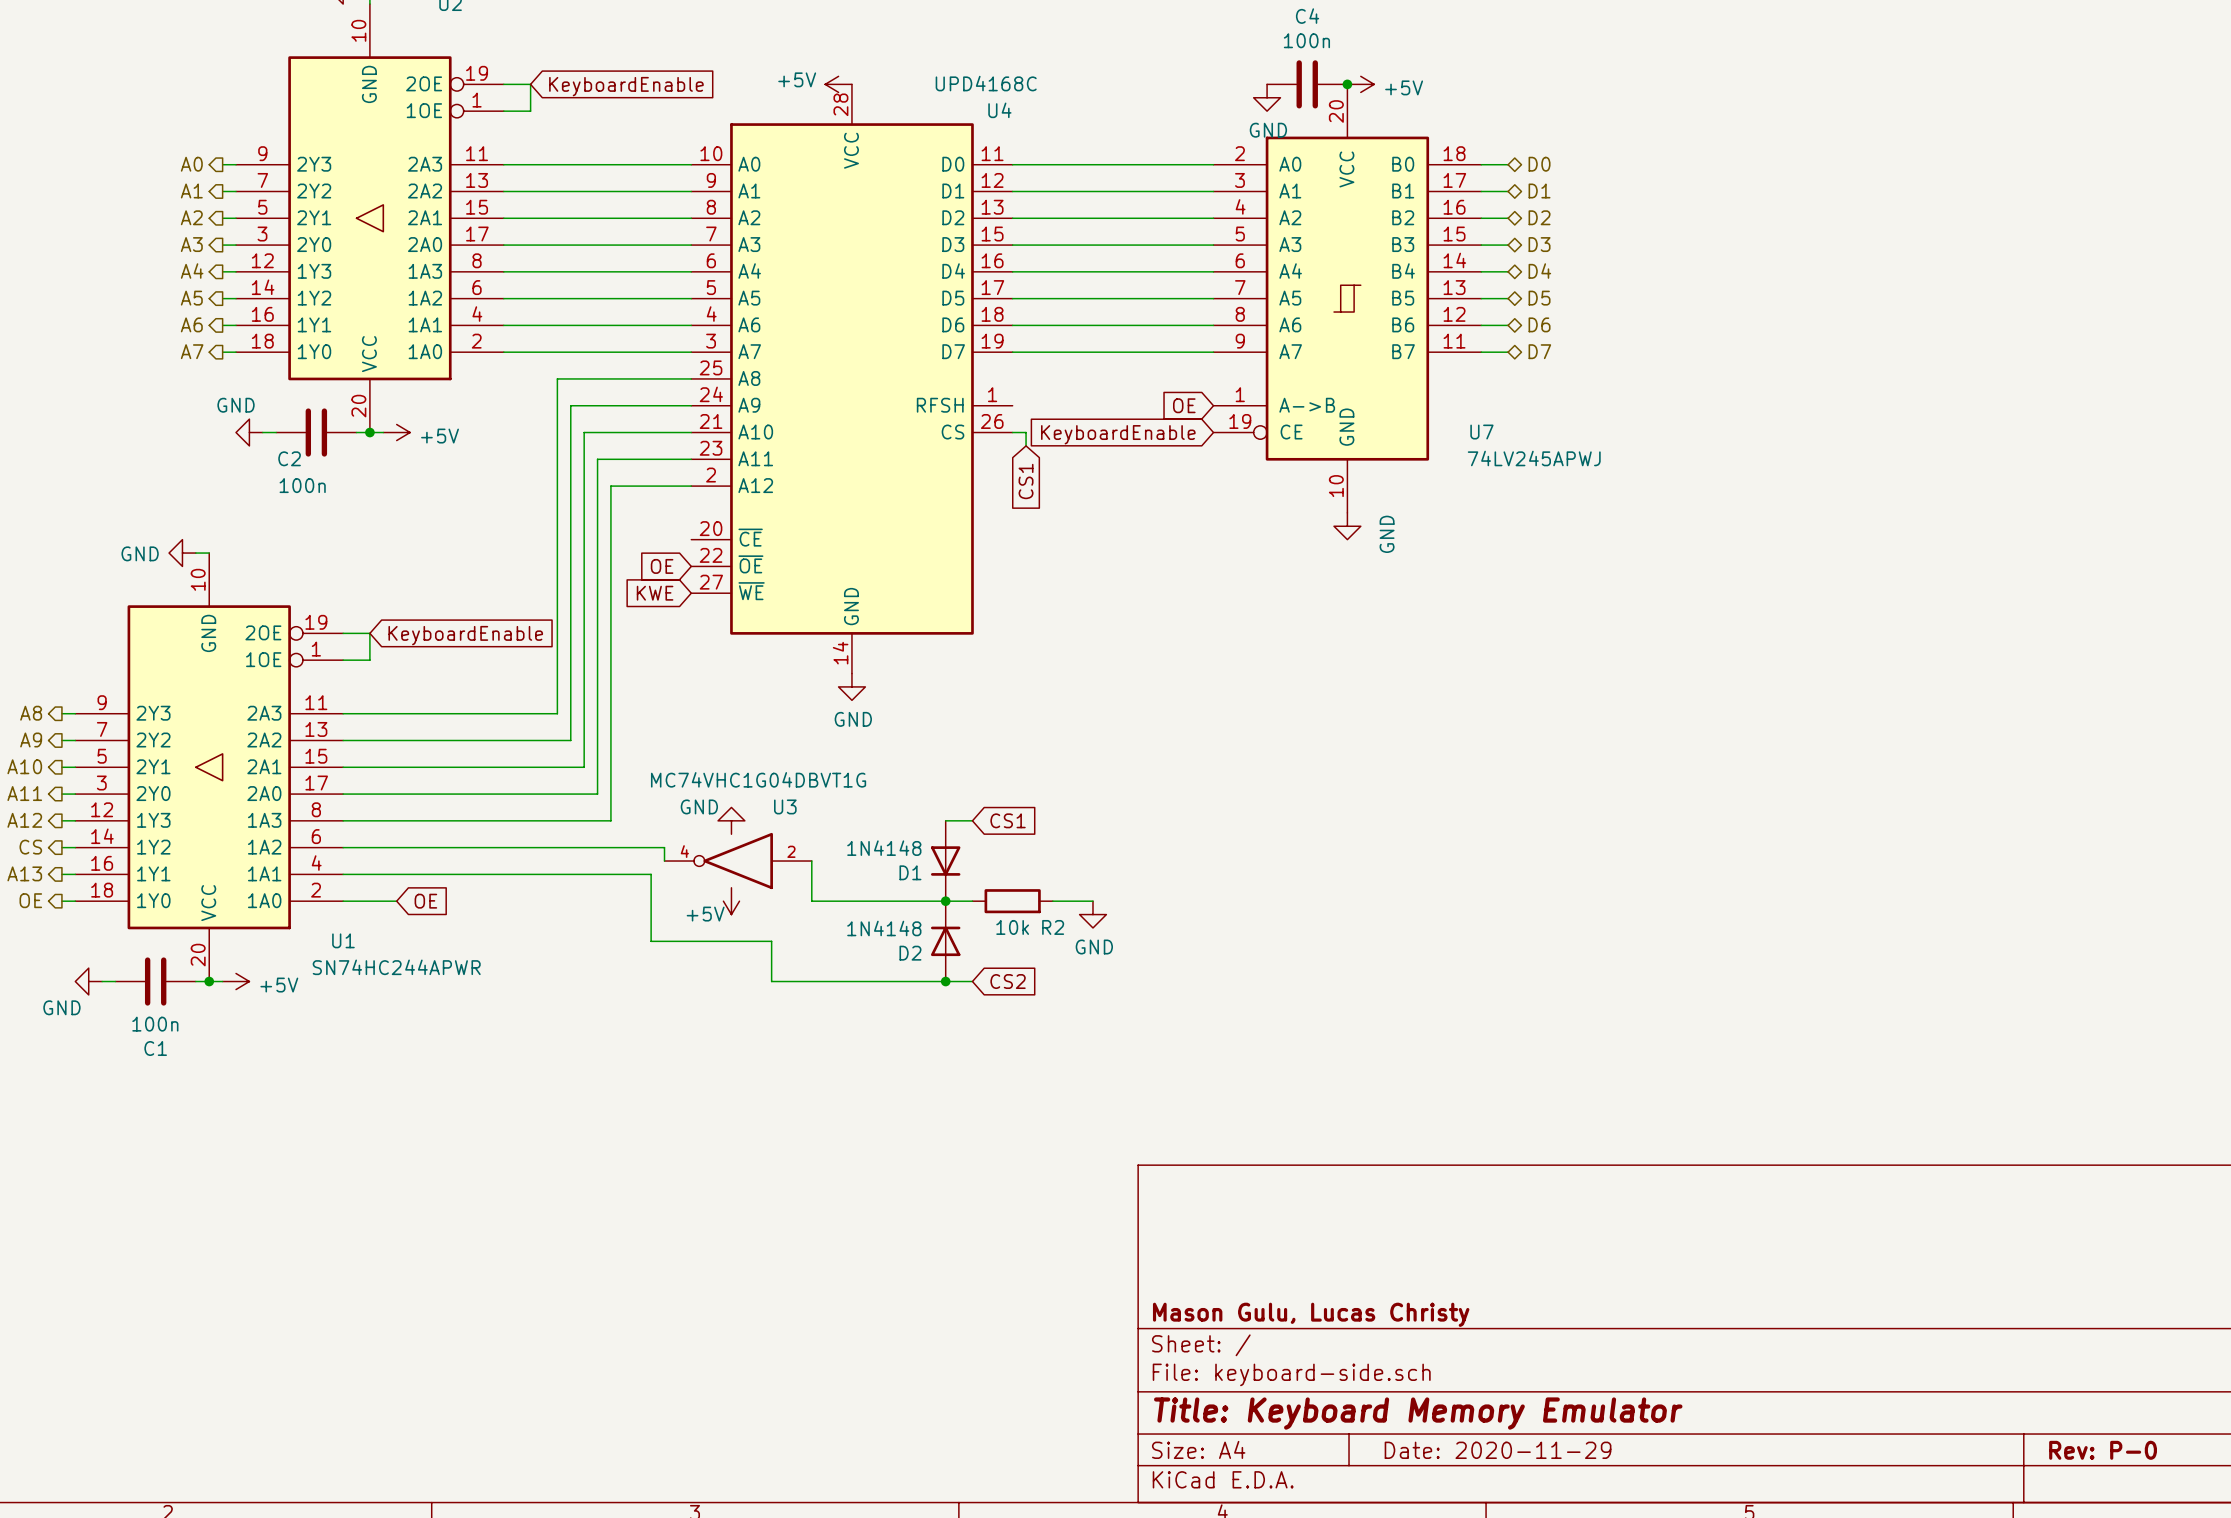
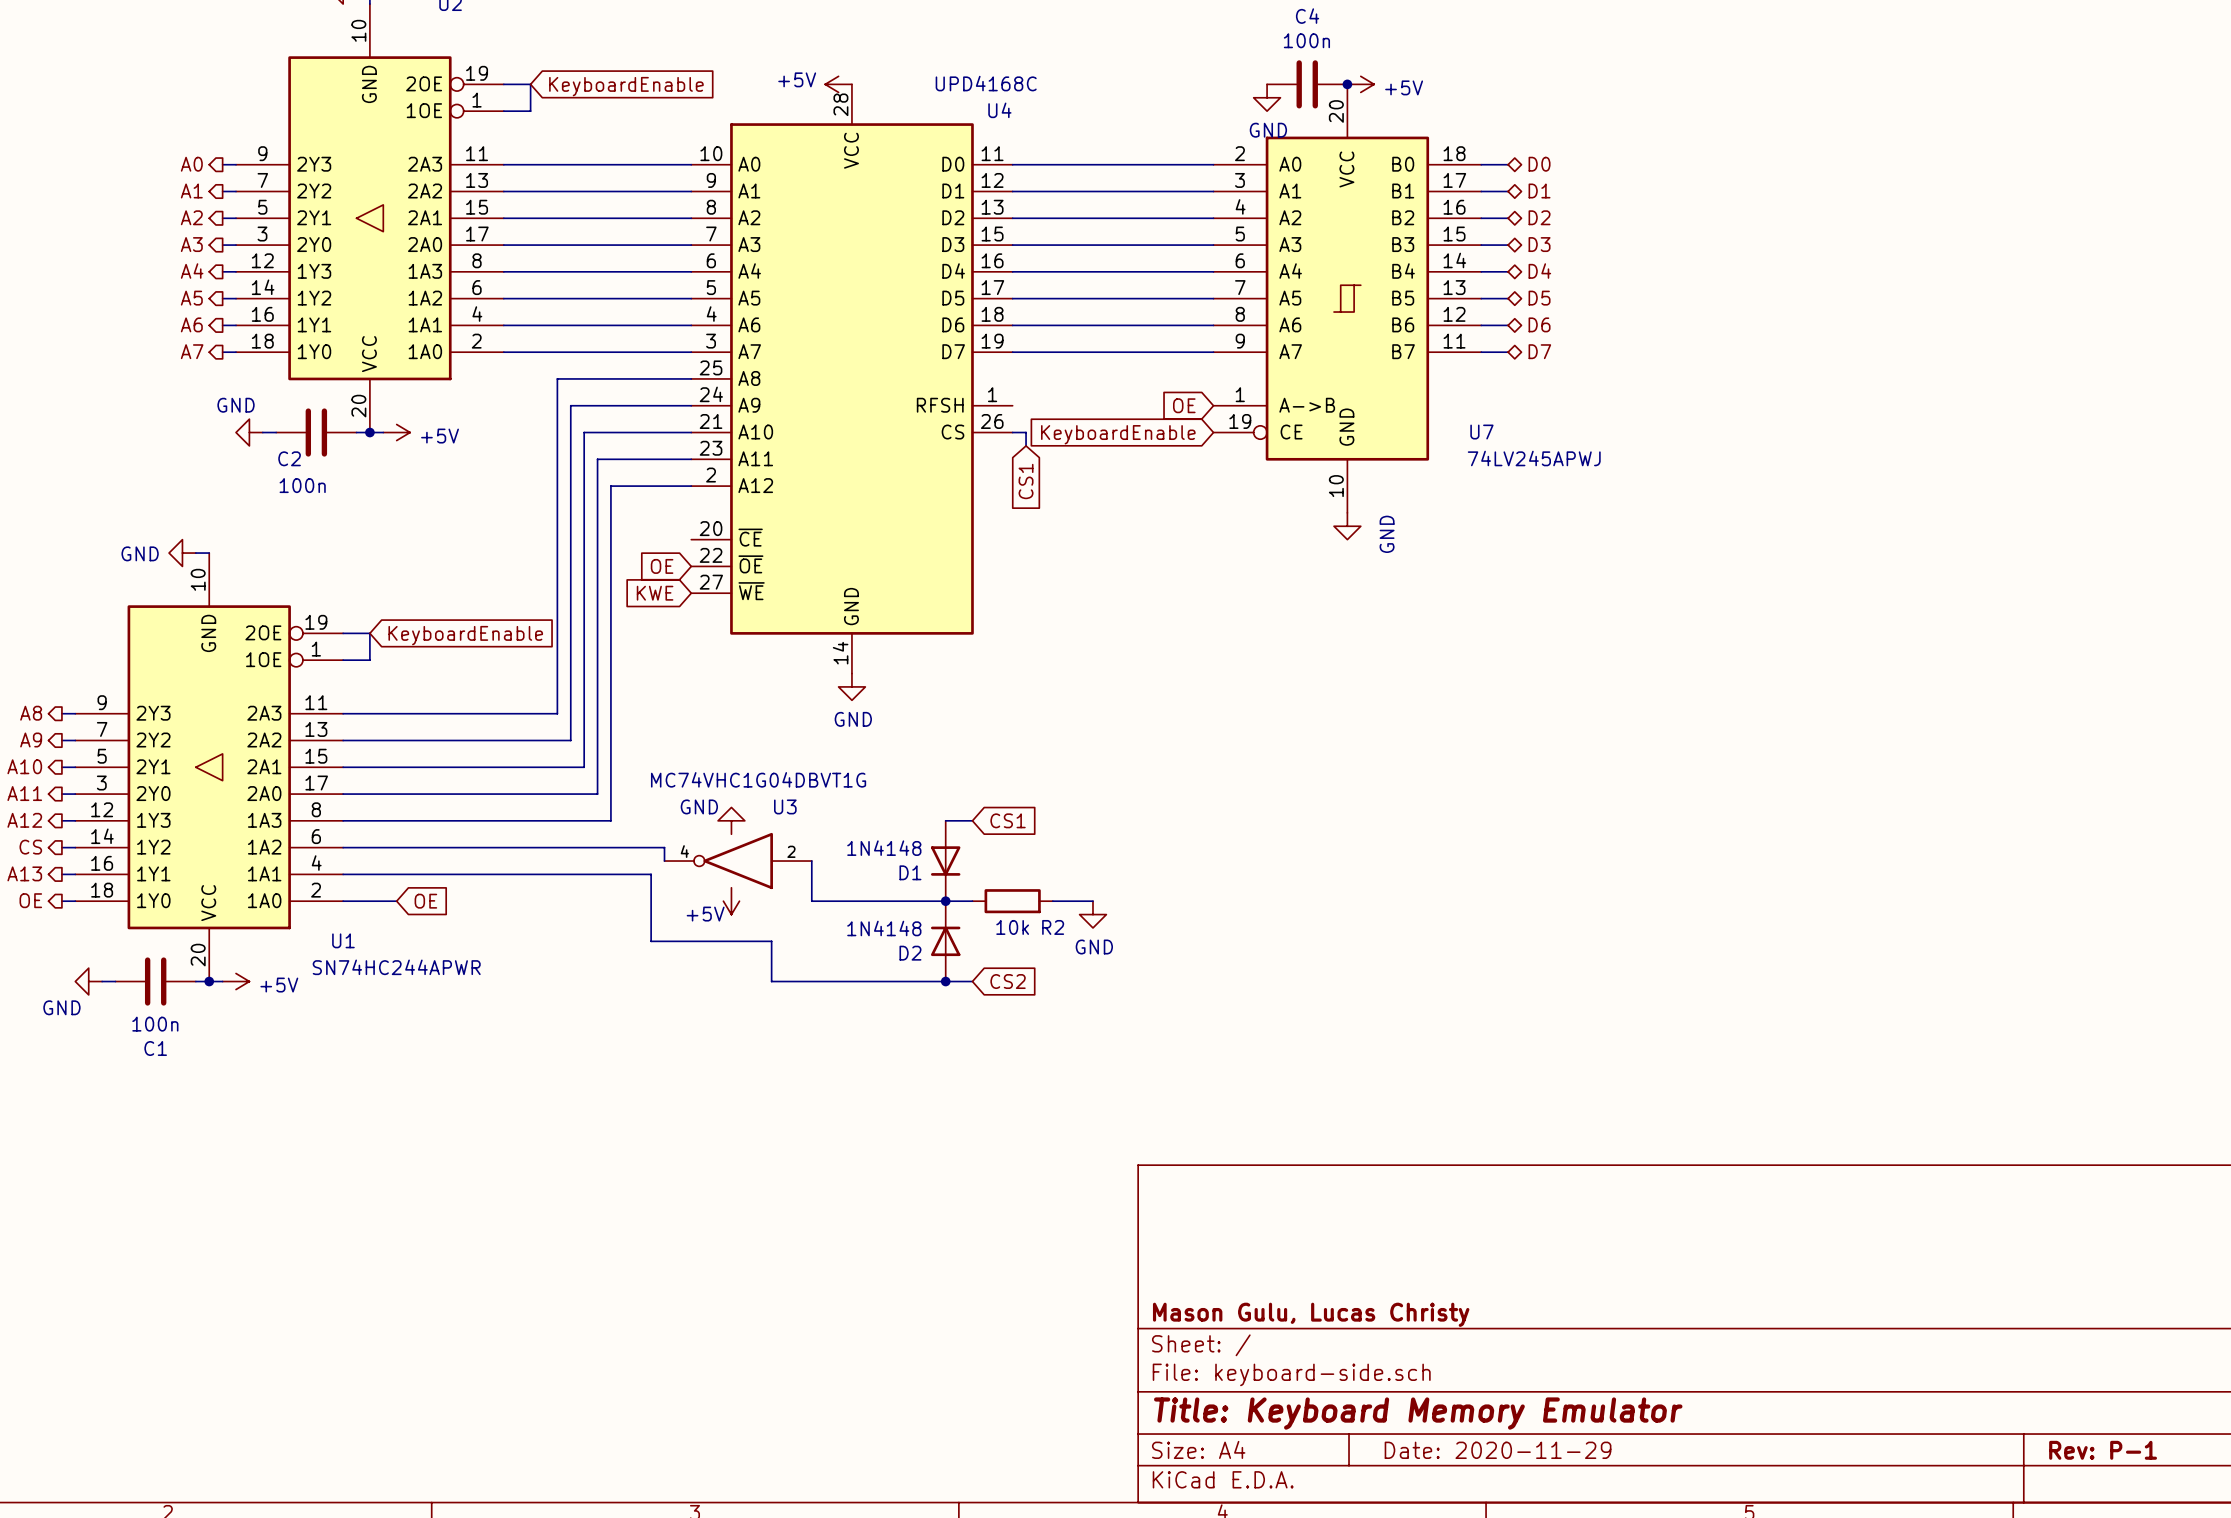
title block: Rev: P-0 (2103, 1450) -> Rev: P-1 (2103, 1450)

